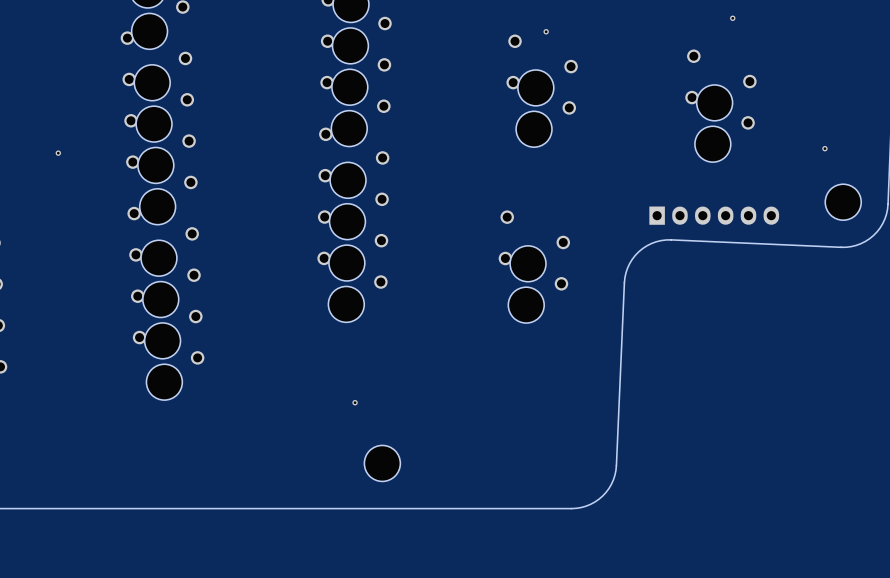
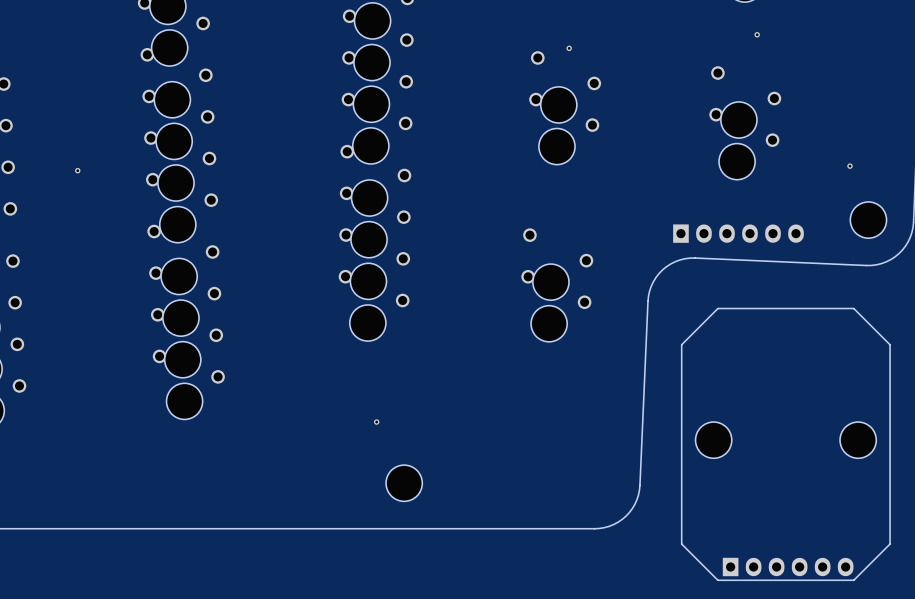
board edge: none -> (853, 308) (717, 308) (681, 344) (681, 544) (717, 580) (853, 580) (890, 544) (890, 344) (853, 308)
part: none -> (713, 440)
part: none -> (858, 440)
part: none -> (788, 567)

